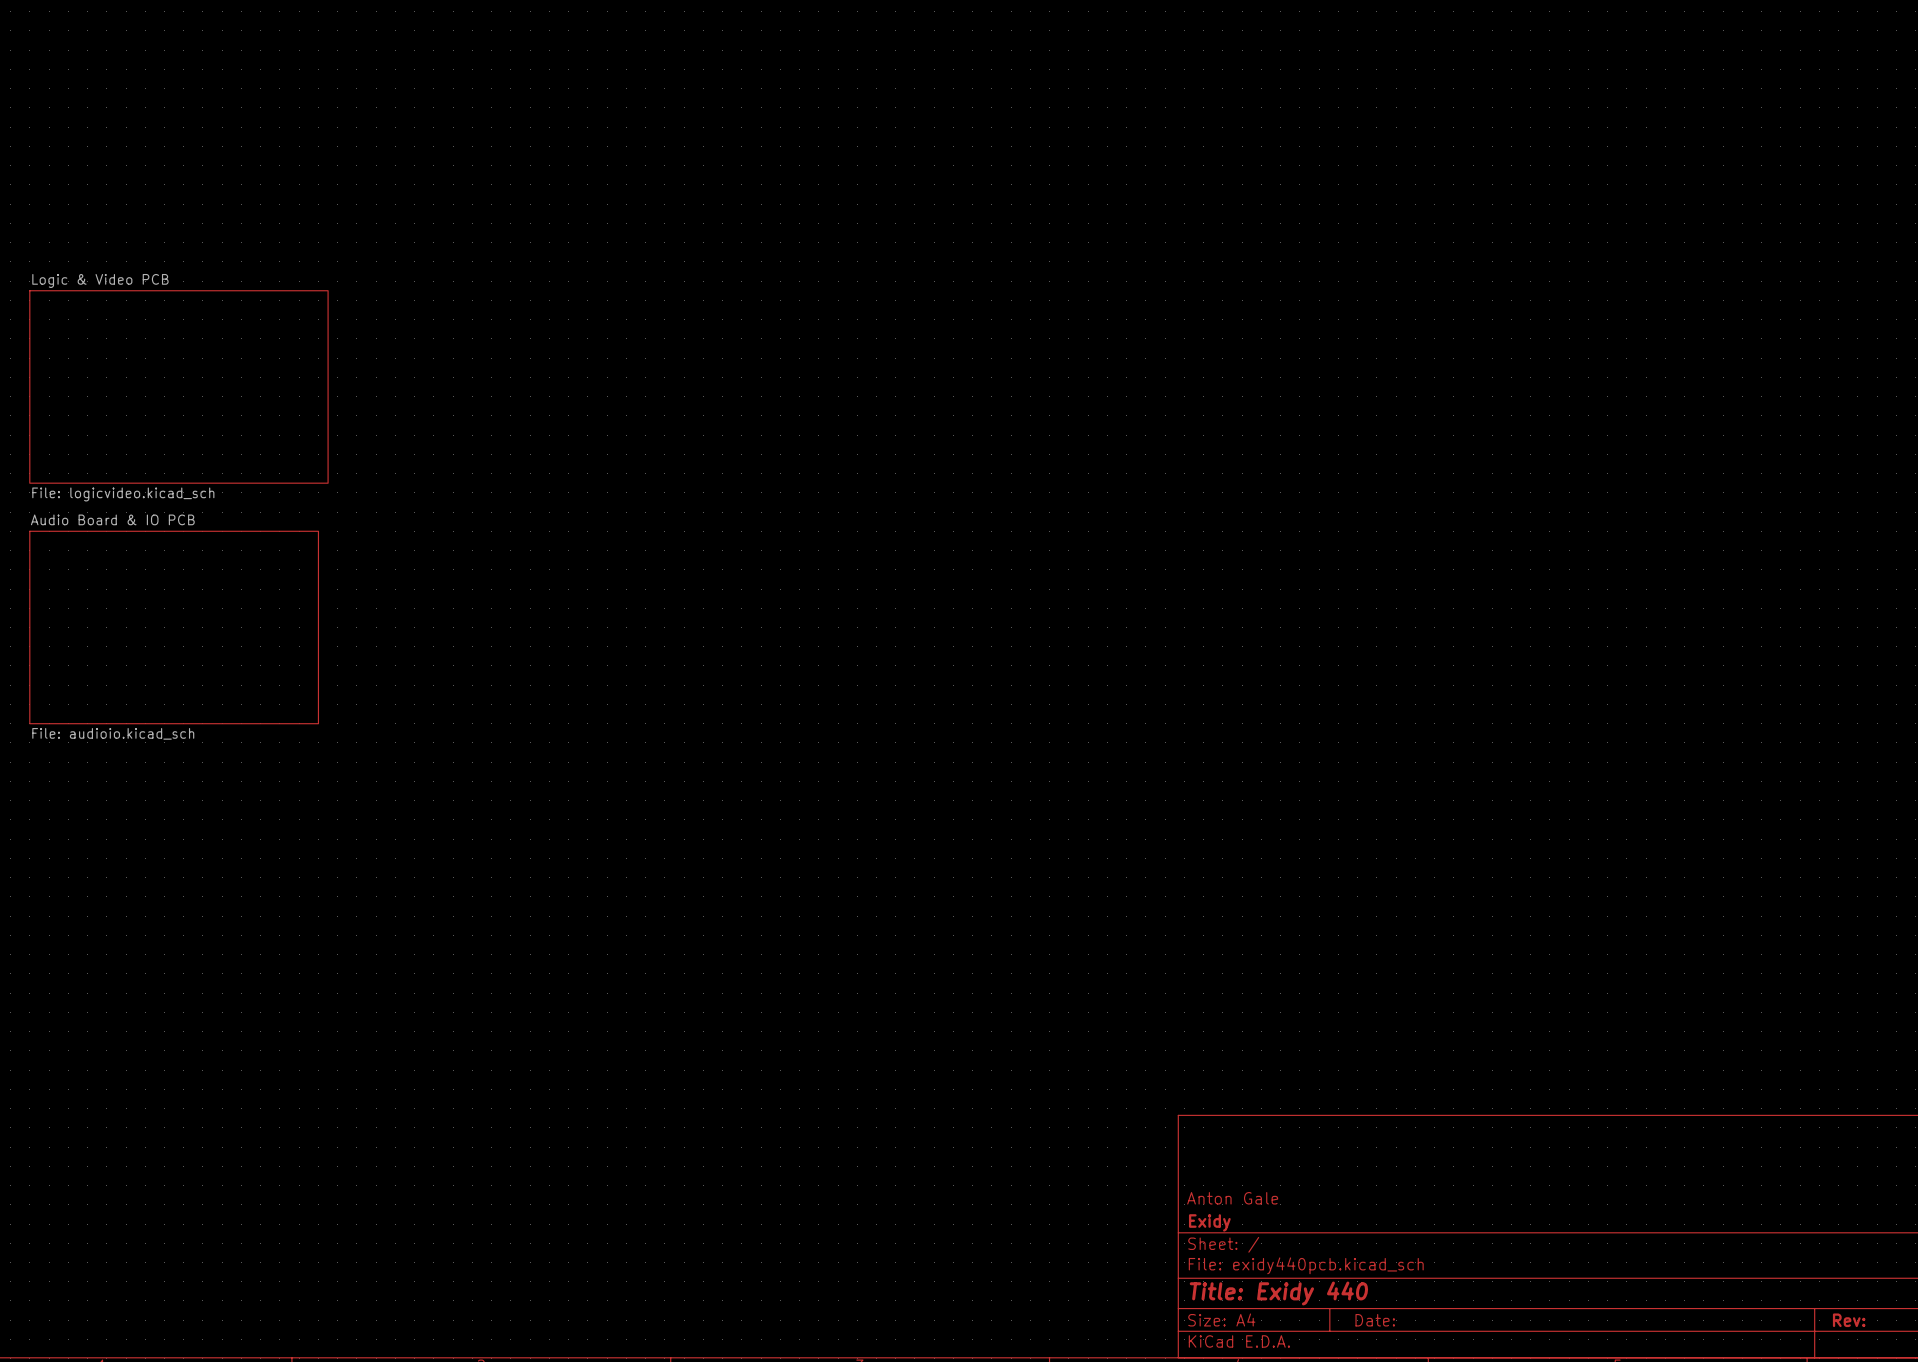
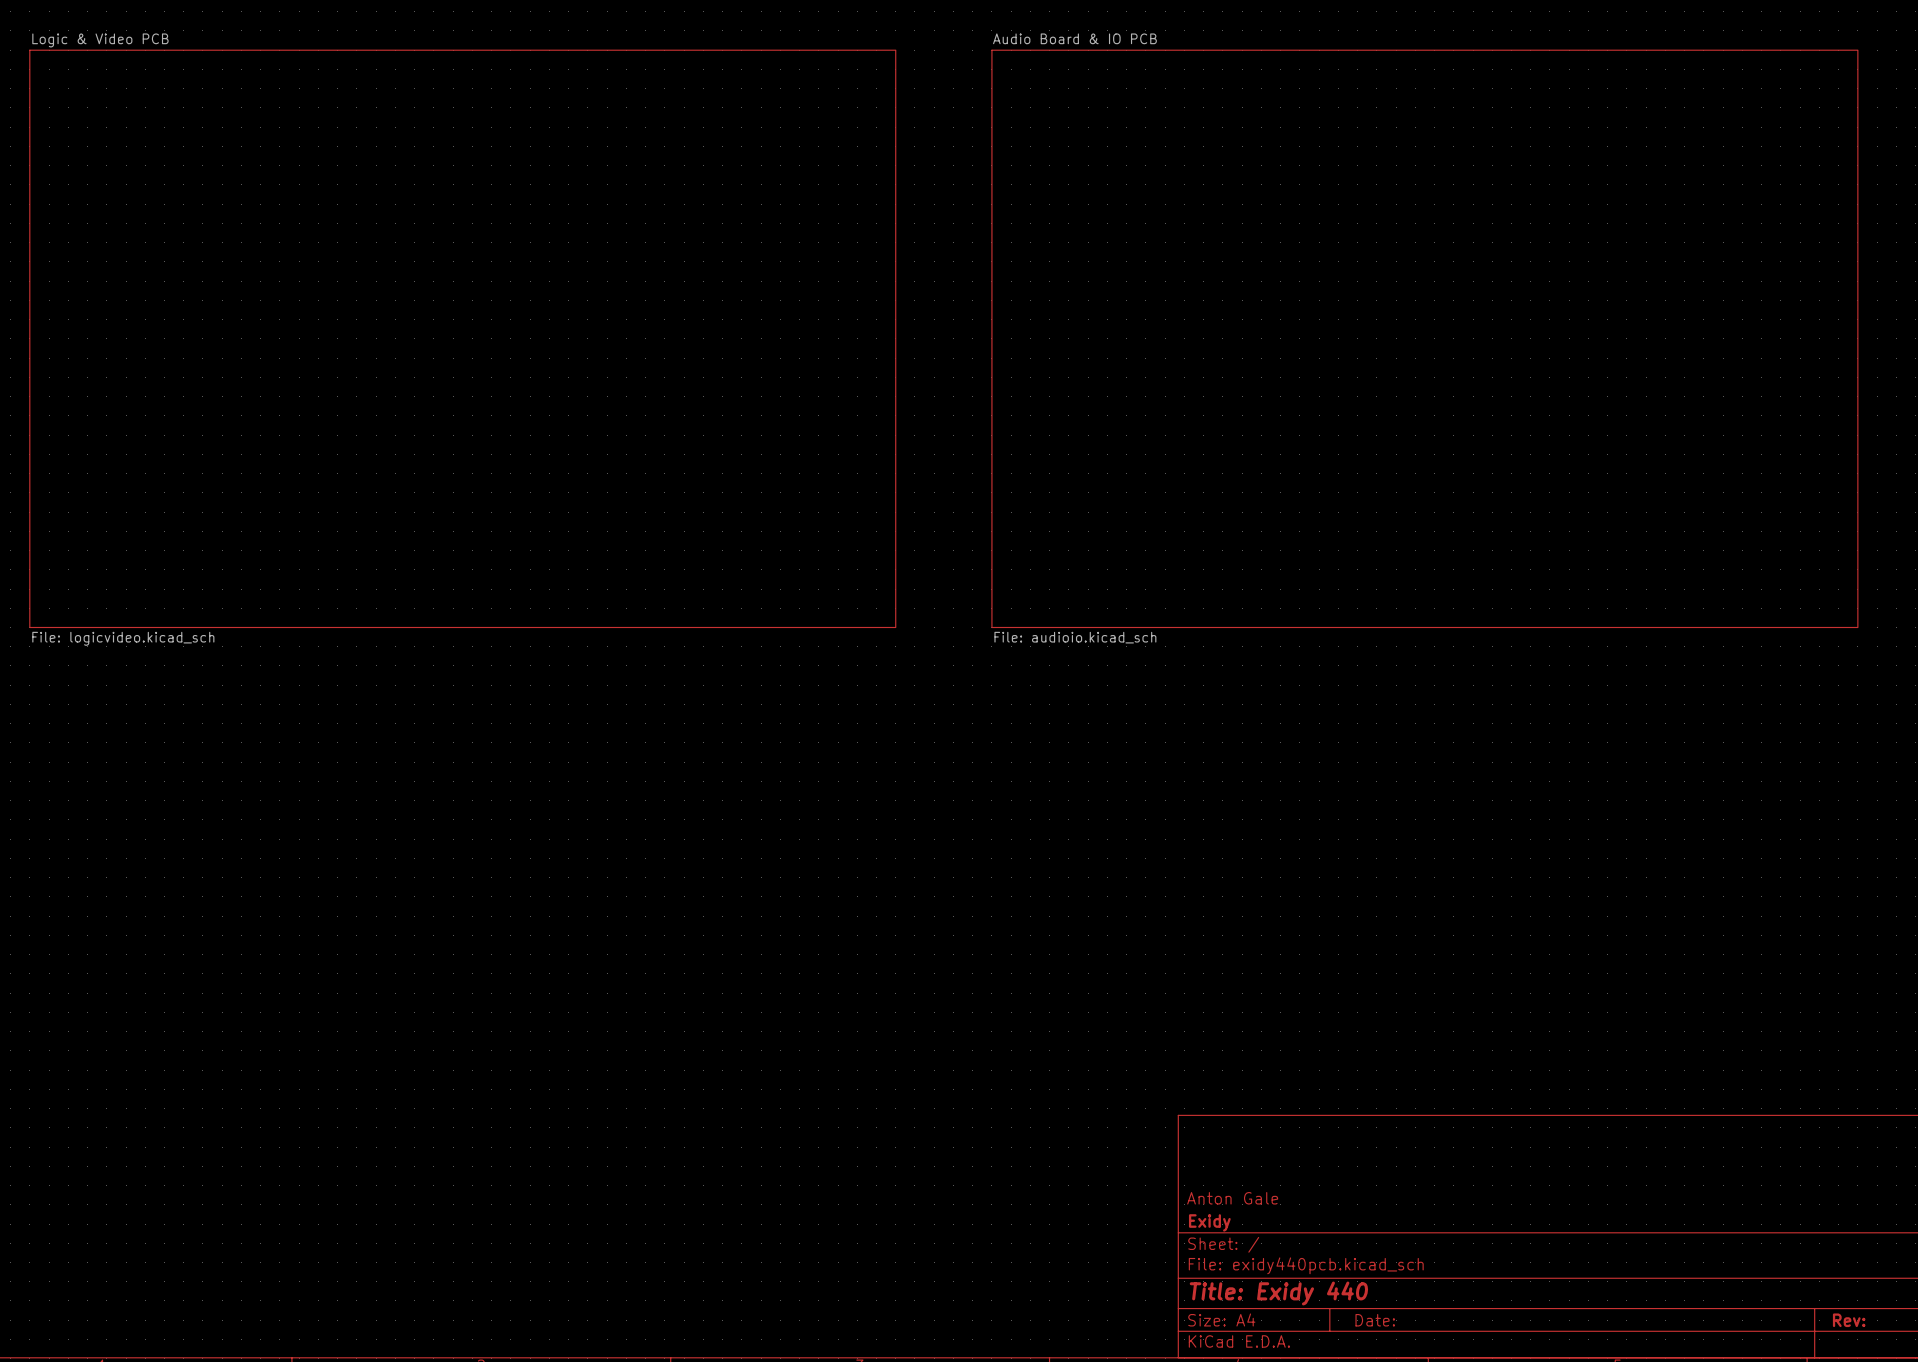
sheet Logic & Video PCB: none -> File: logicvideo.kicad_sch (462, 338)
sheet Audio Board & IO PCB: none -> File: audioio.kicad_sch (1424, 338)
sheet Logic & Video PCB: File: logicvideo.kicad_sch (178, 386) -> none
sheet Audio Board & IO PCB: File: audioio.kicad_sch (174, 627) -> none

